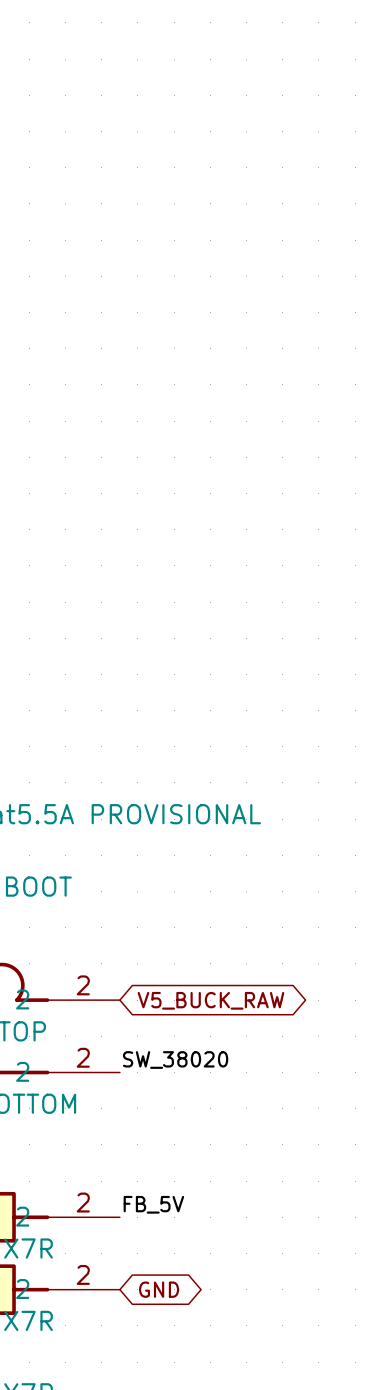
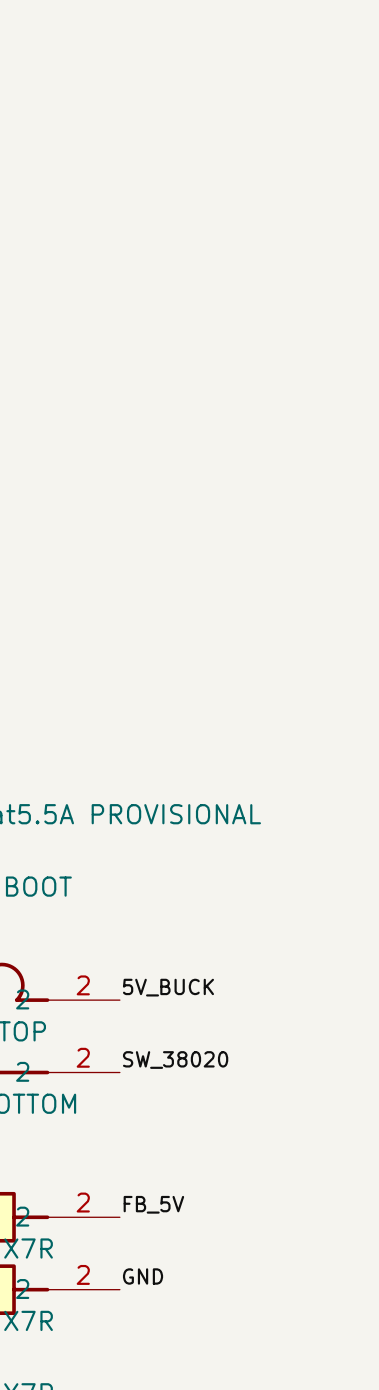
label: none -> 5V_BUCK (168, 987)
global label: V5_BUCK_RAW (210, 1000) -> none
label: none -> GND (143, 1276)
global label: GND (159, 1289) -> none

